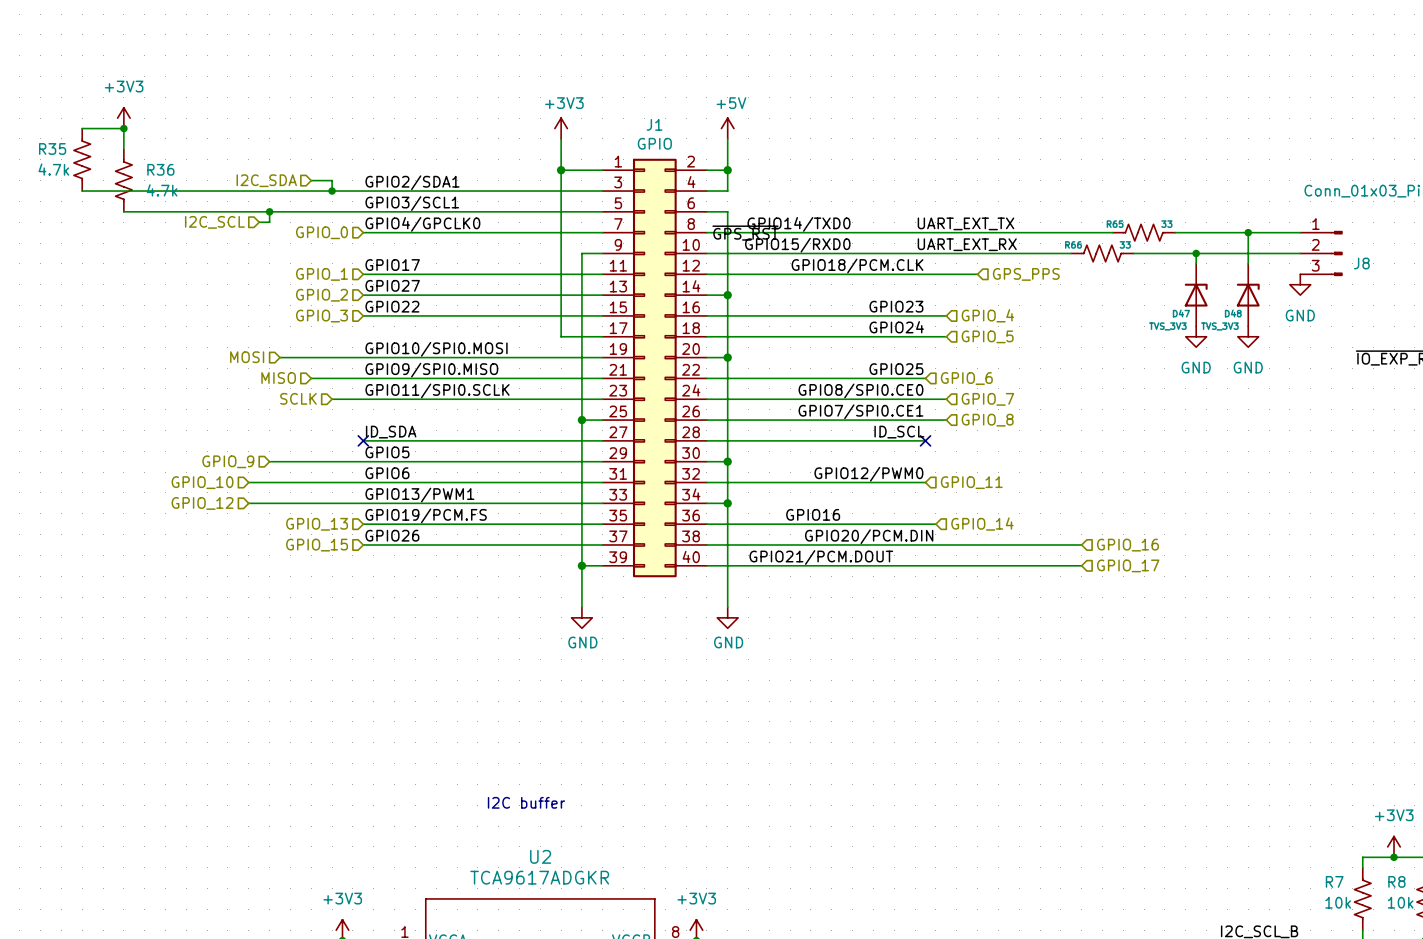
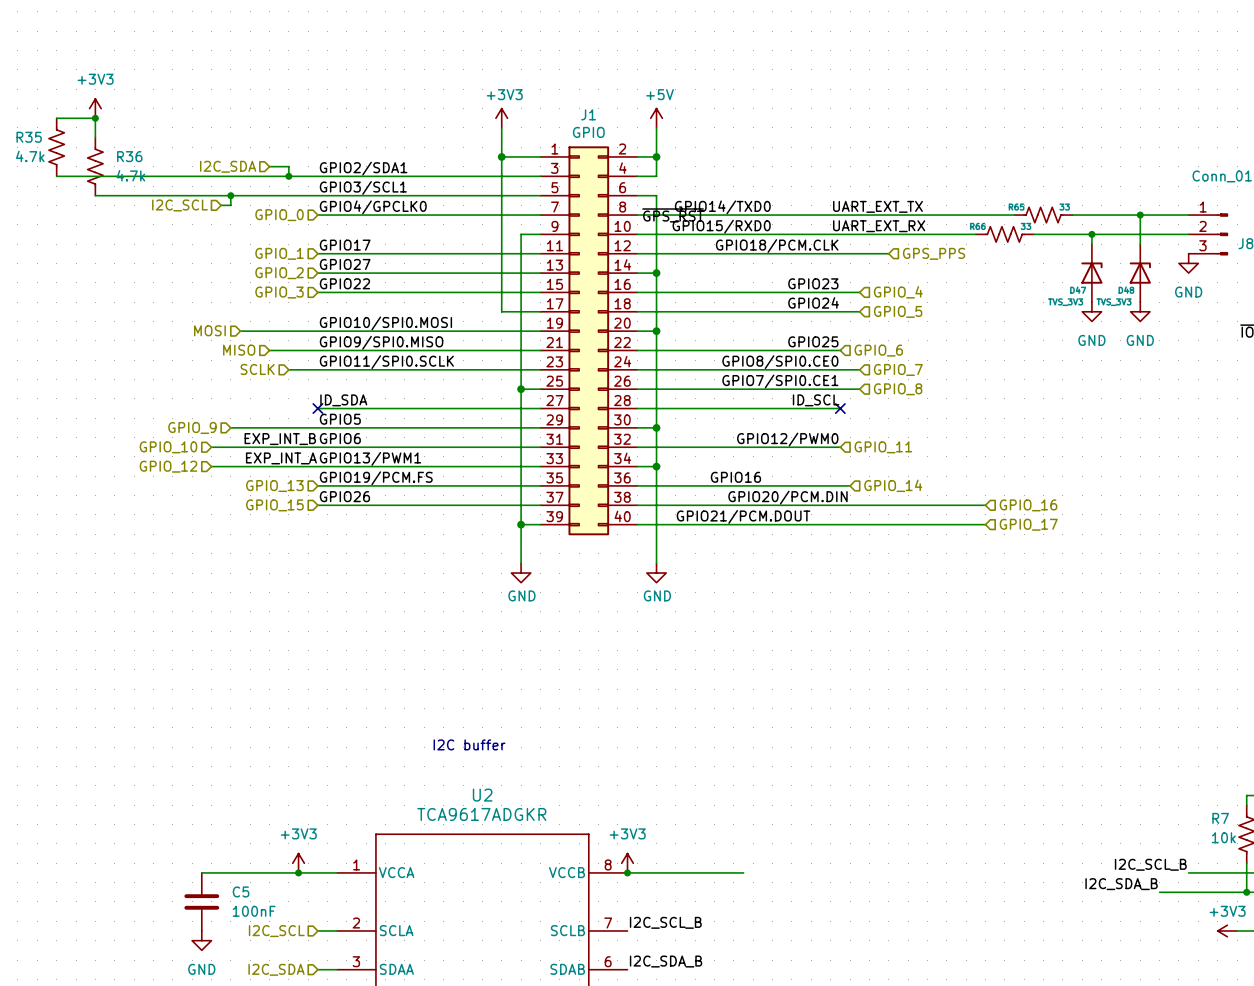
label: none -> EXP_INT_B (280, 439)
label: none -> EXP_INT_A (281, 458)

